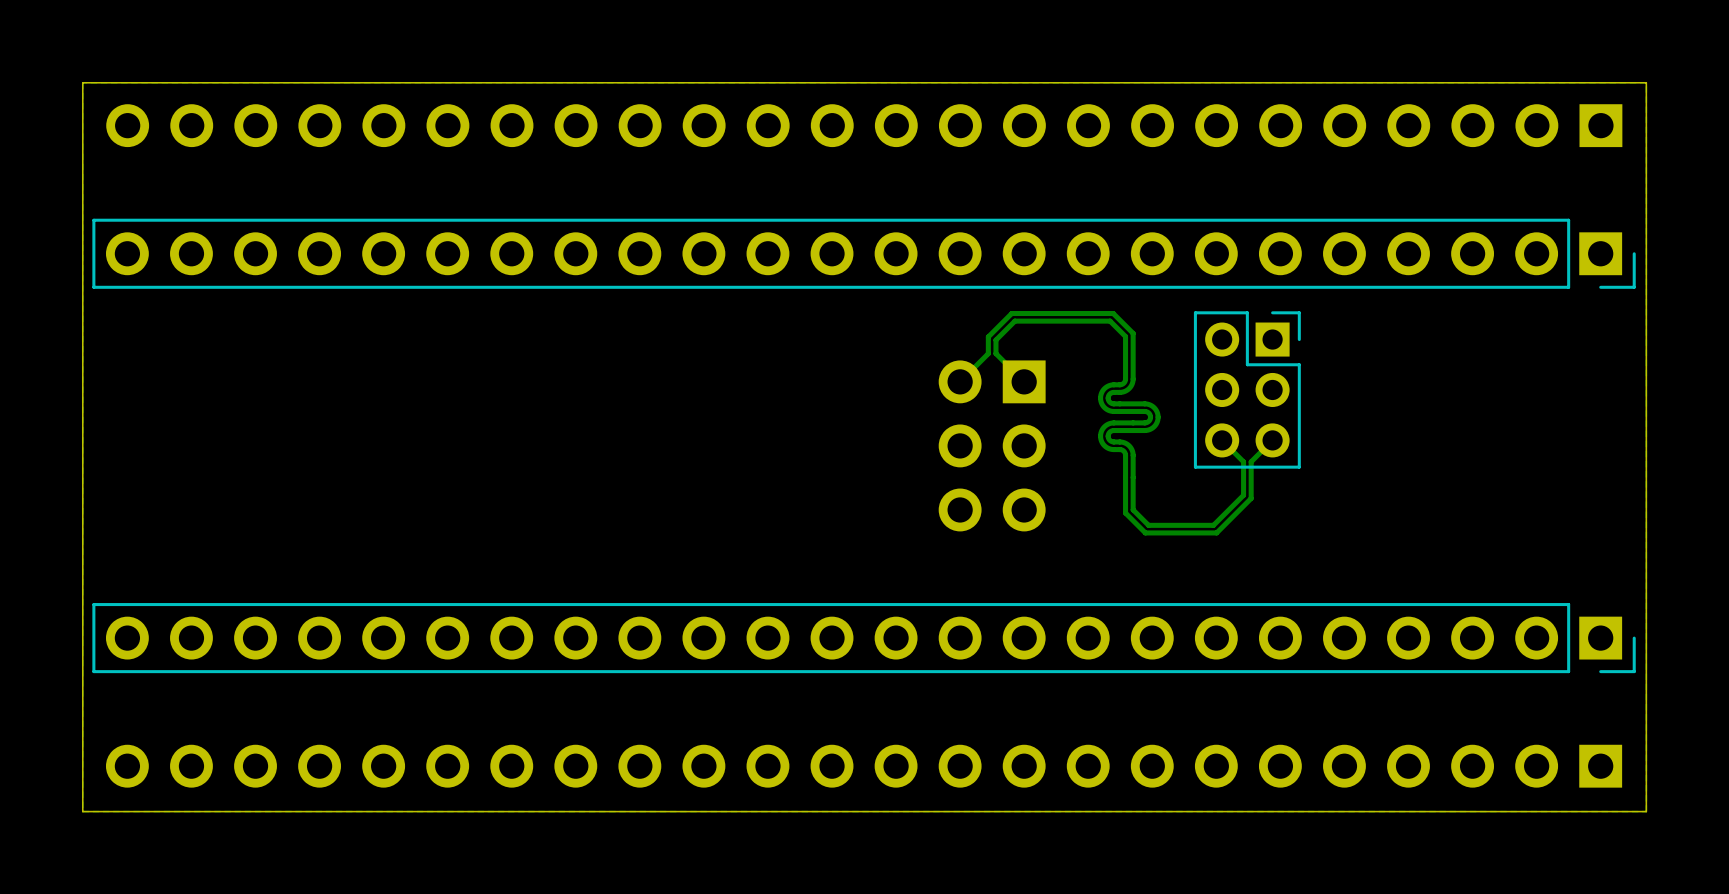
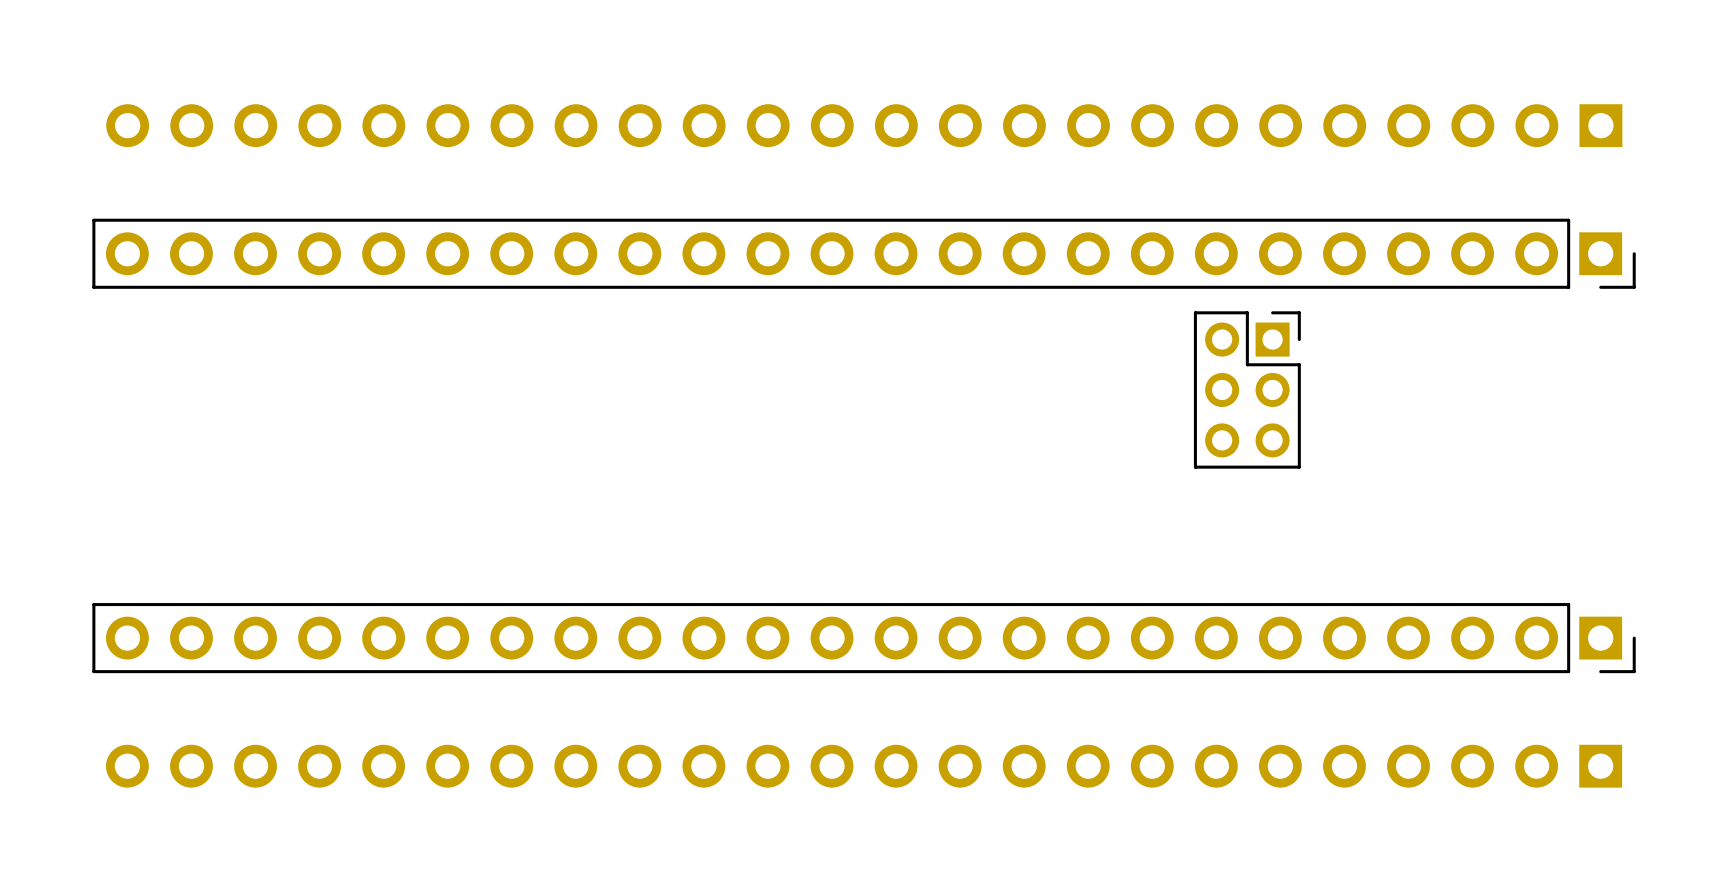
board edge: (1646, 82) (1646, 811) (82, 811) (82, 82) (1646, 82) -> none
track: (960, 381) (988, 353) (988, 336) (1011, 313) (1113, 313) (1133, 333) (1133, 379) (1128, 389) (1111, 393) (1108, 400) (1113, 403) (1149, 404) (1155, 408) (1158, 415) (1156, 424) (1149, 429) (1113, 430) (1108, 434) (1110, 440) (1125, 443) (1132, 450) (1133, 509) (1148, 525) (1213, 525) (1243, 495) (1243, 461) (1222, 440) -> none
track: (1024, 381) (995, 353) (995, 340) (1014, 321) (1110, 321) (1125, 336) (1125, 381) (1121, 384) (1105, 387) (1101, 393) (1101, 402) (1105, 408) (1110, 411) (1146, 411) (1149, 414) (1150, 418) (1145, 422) (1109, 423) (1102, 429) (1100, 437) (1106, 447) (1121, 449) (1125, 453) (1125, 513) (1145, 532) (1216, 532) (1251, 498) (1251, 461) (1272, 440) -> none
part: (992, 445) -> none

